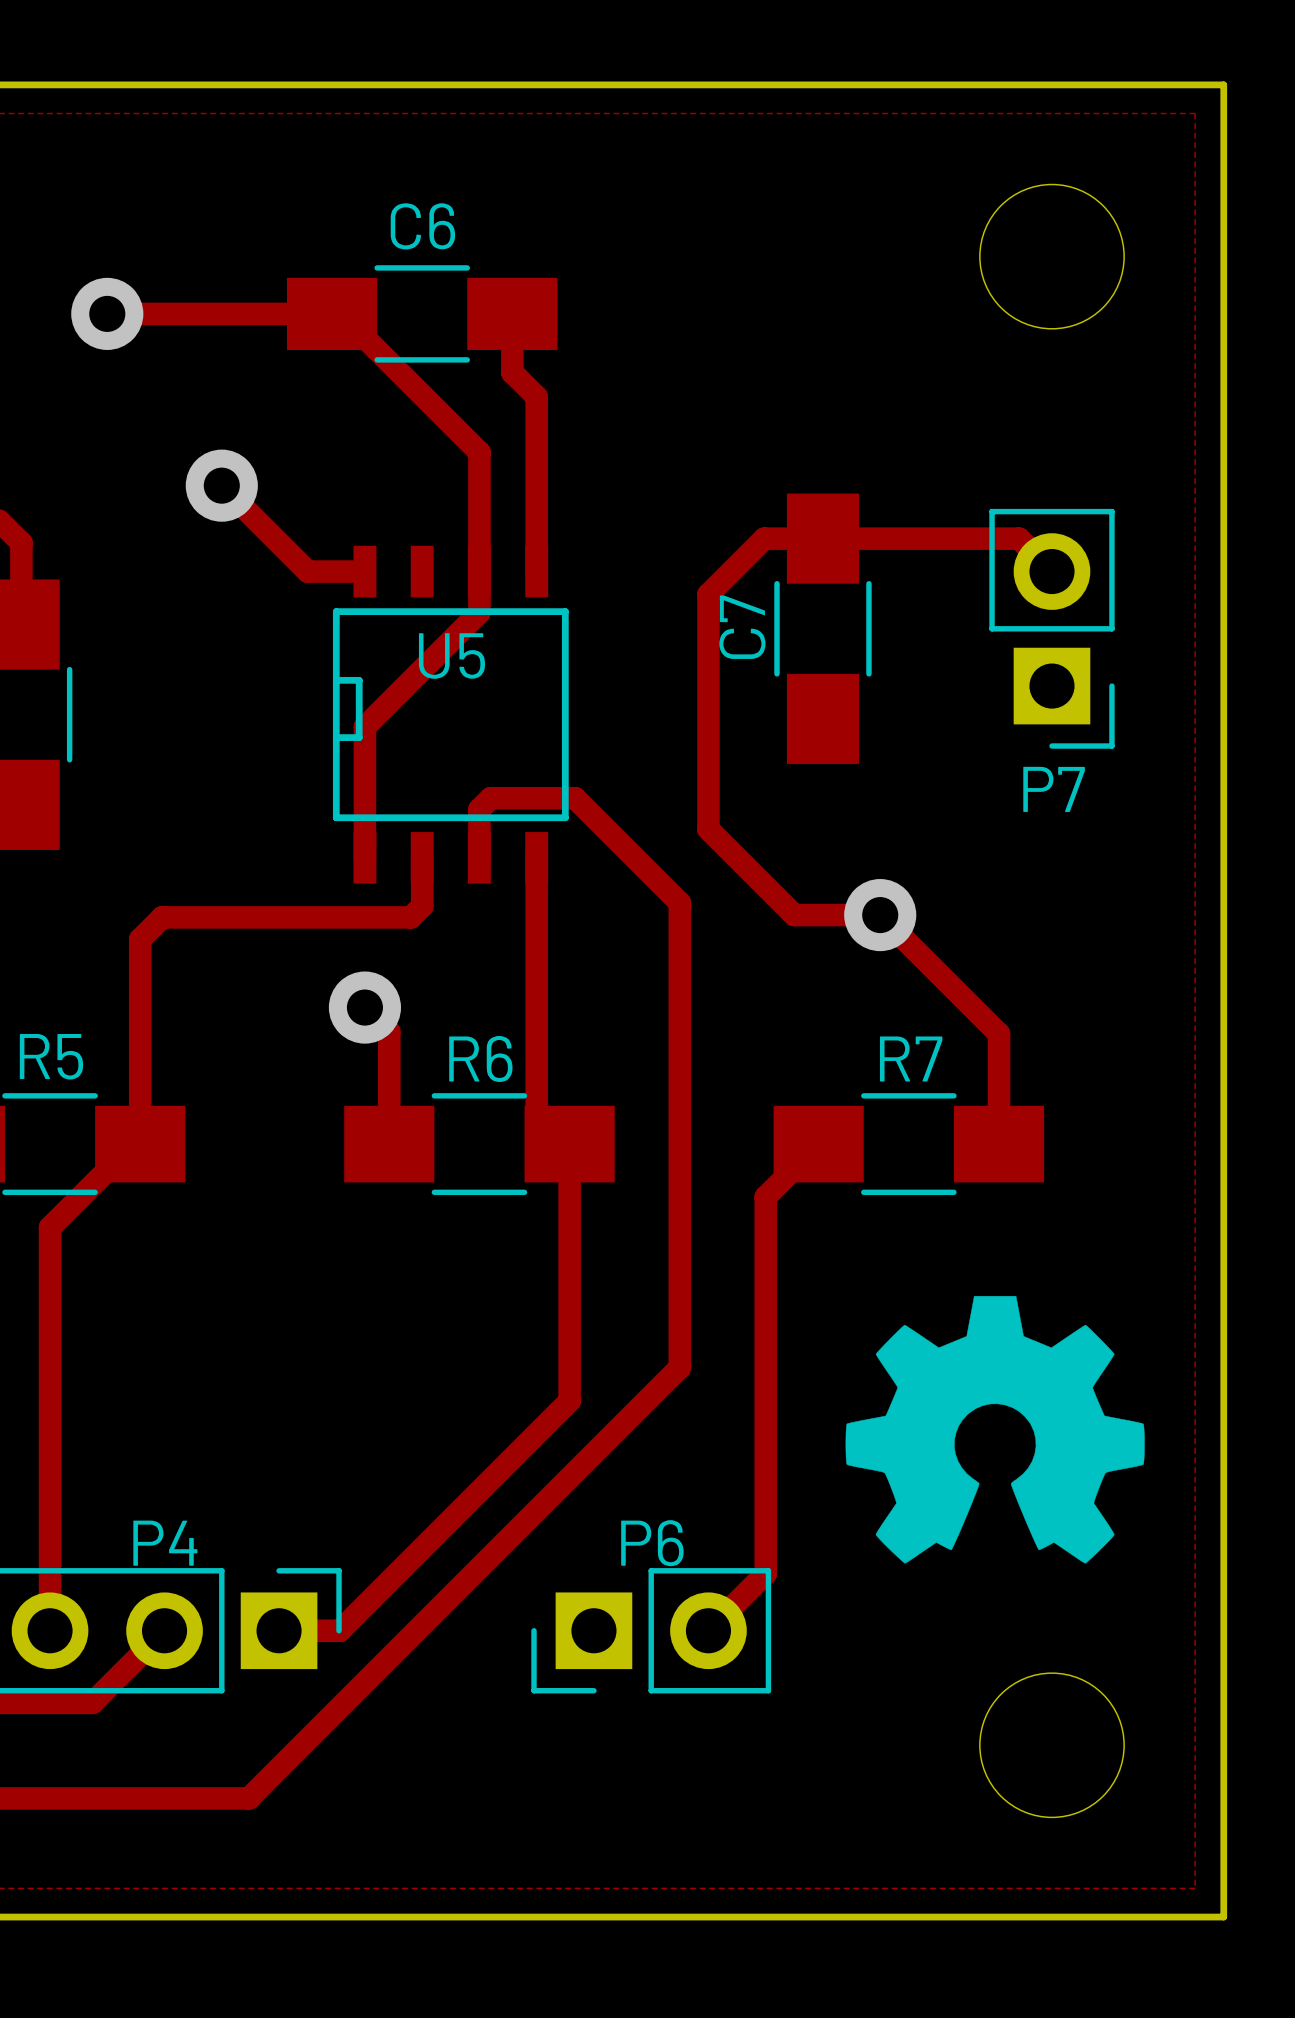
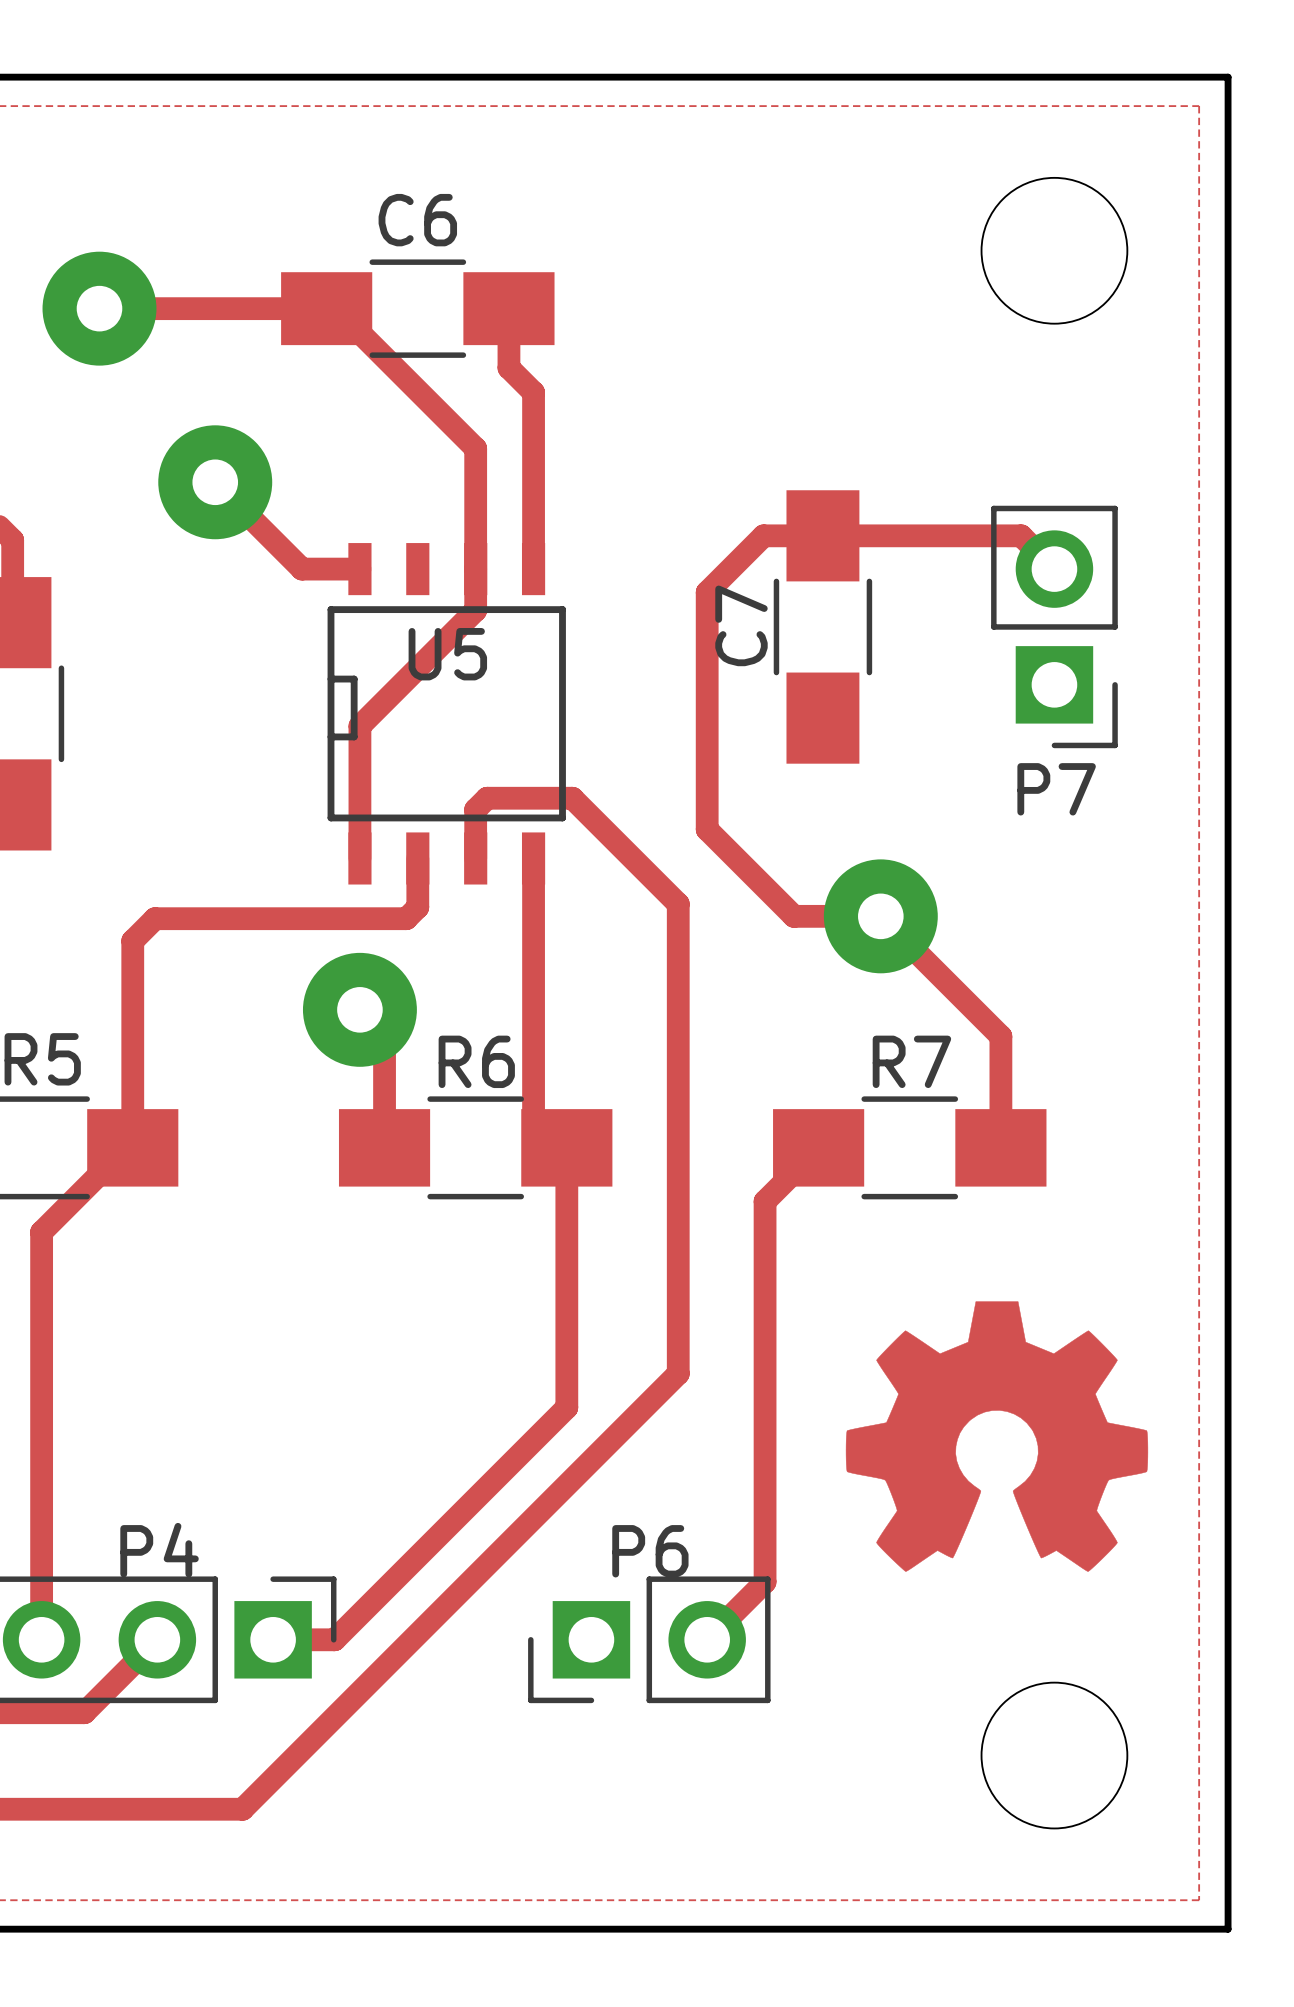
via size: [71, 277, 144, 350] -> [42, 251, 157, 366]
via size: [185, 449, 258, 522] -> [158, 425, 273, 540]
via size: [844, 879, 917, 952] -> [823, 859, 938, 974]
via size: [328, 971, 402, 1044] -> [302, 952, 417, 1067]
drawing shape: [845, 1295, 1145, 1564] -> [845, 1301, 1149, 1572]

